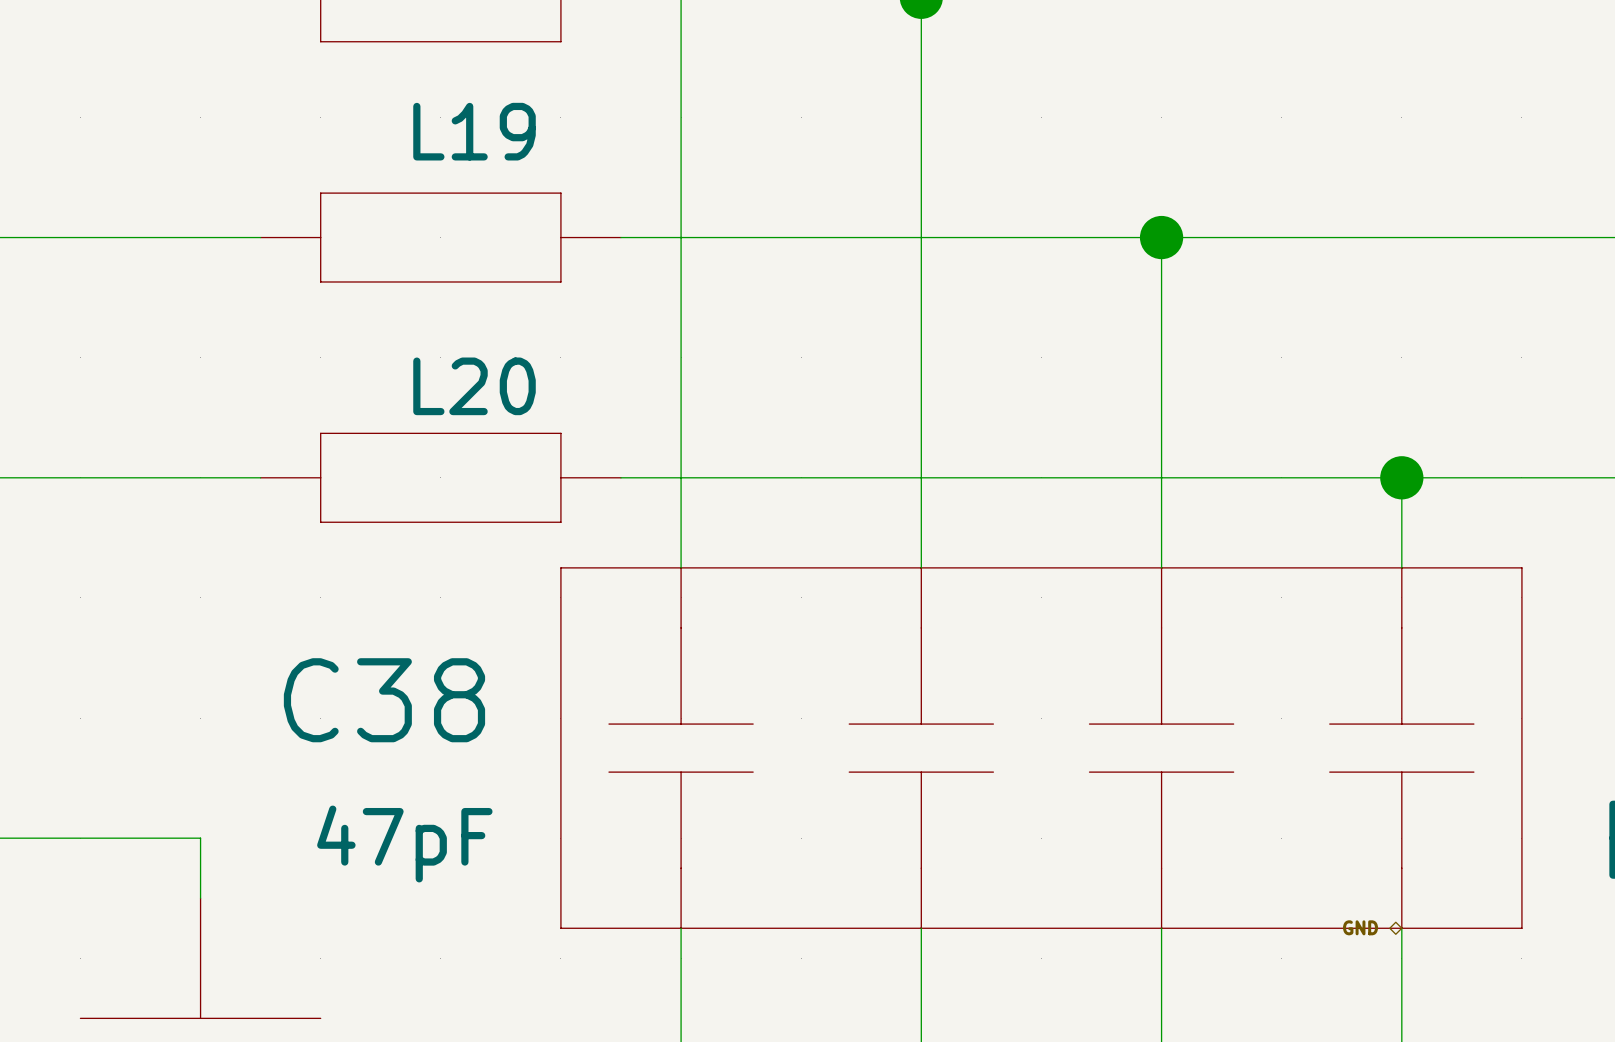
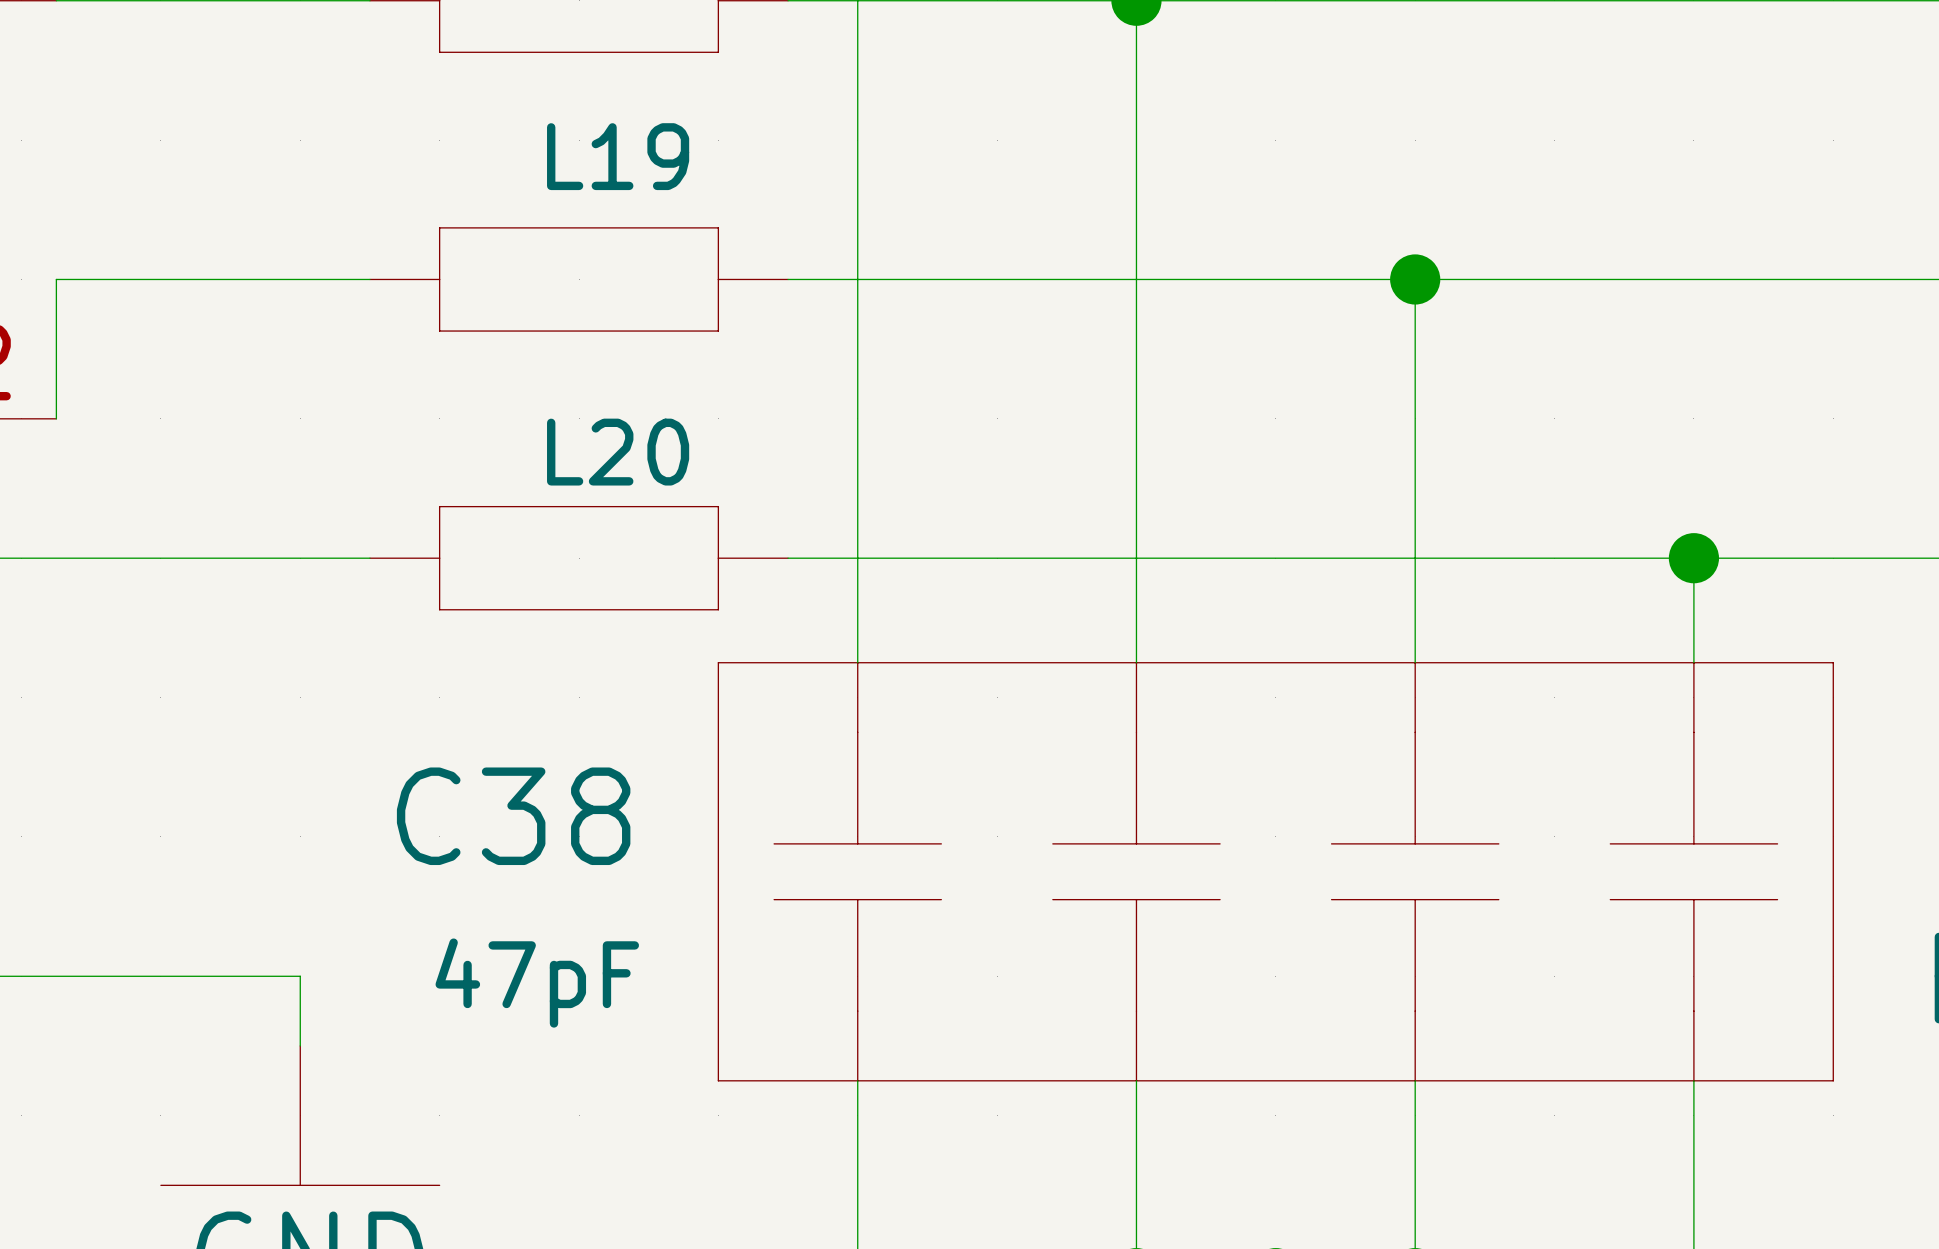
hierarchical label: GND (1360, 927) -> none

